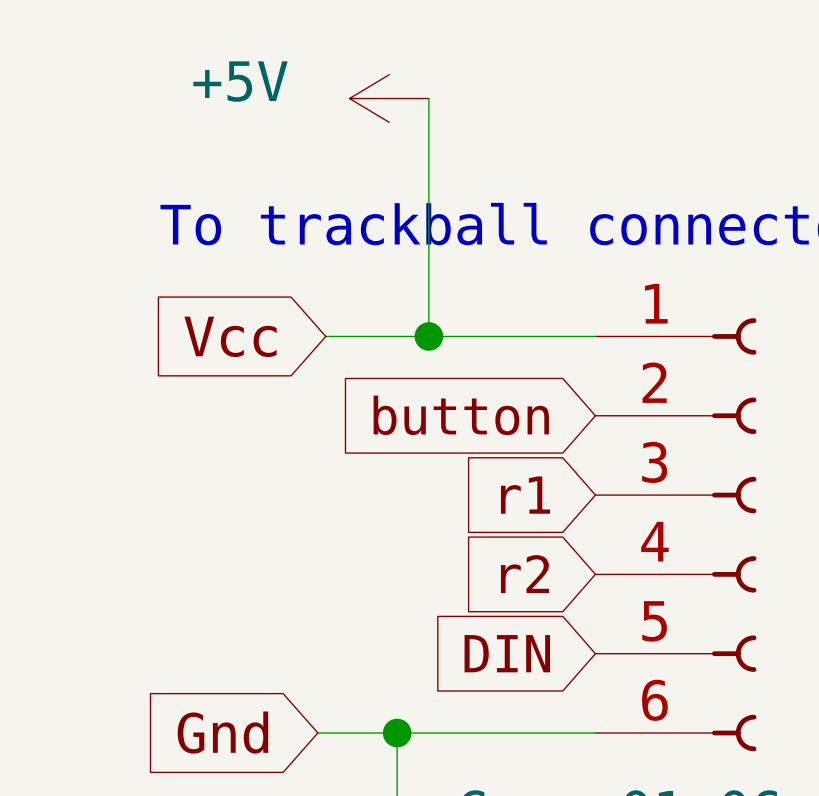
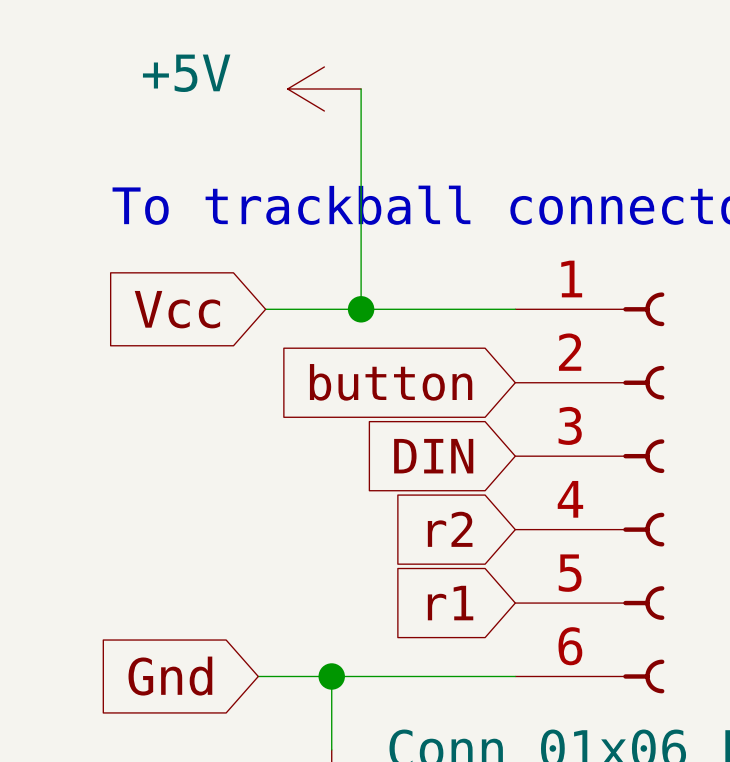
global label: r1 (525, 495) -> DIN (433, 456)
global label: DIN (507, 653) -> r1 (450, 603)

